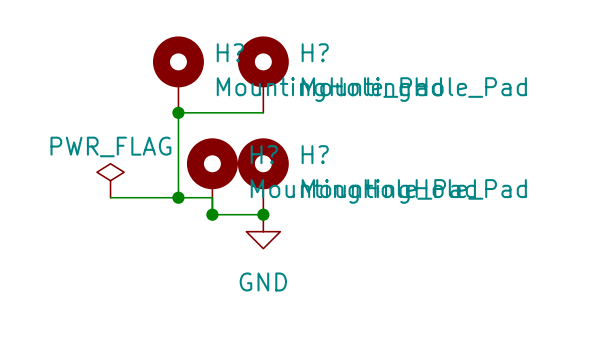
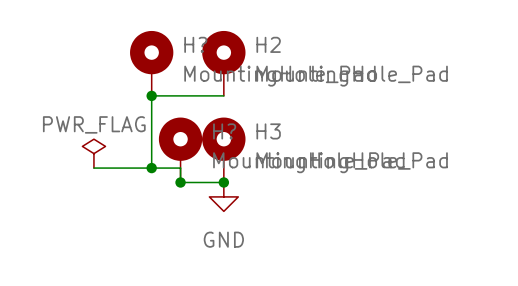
H? name: H? (315, 52) -> H2 (268, 44)
H? name: H? (315, 154) -> H3 (268, 131)

